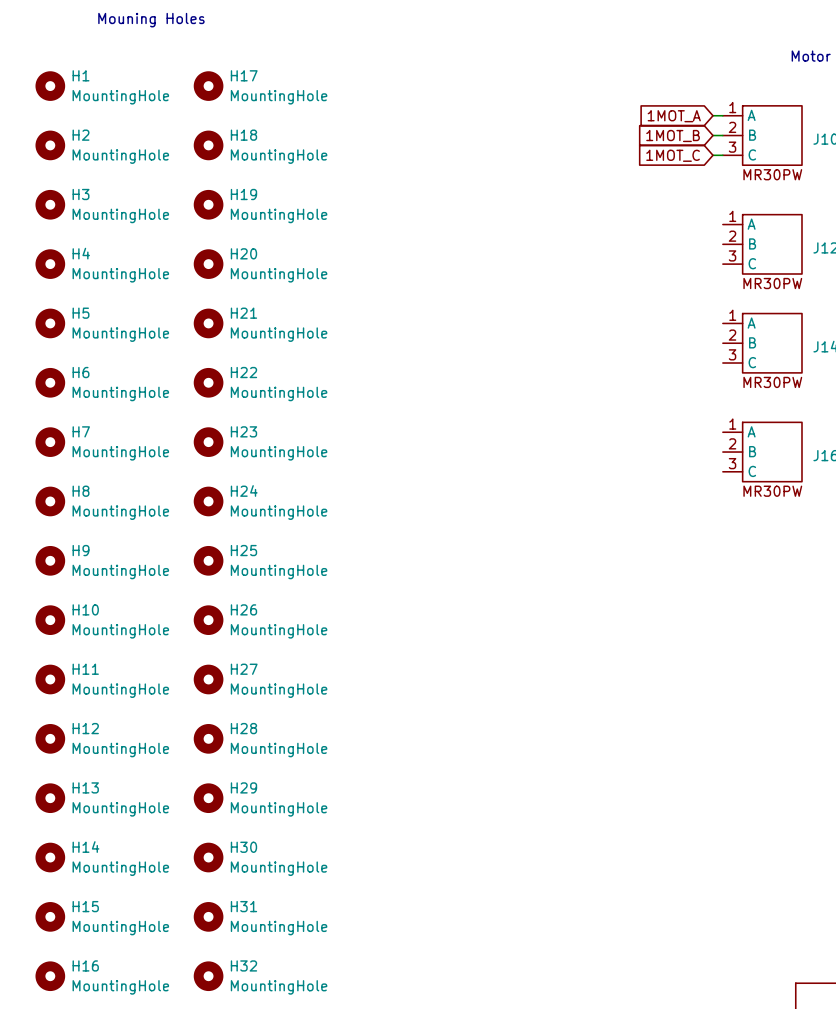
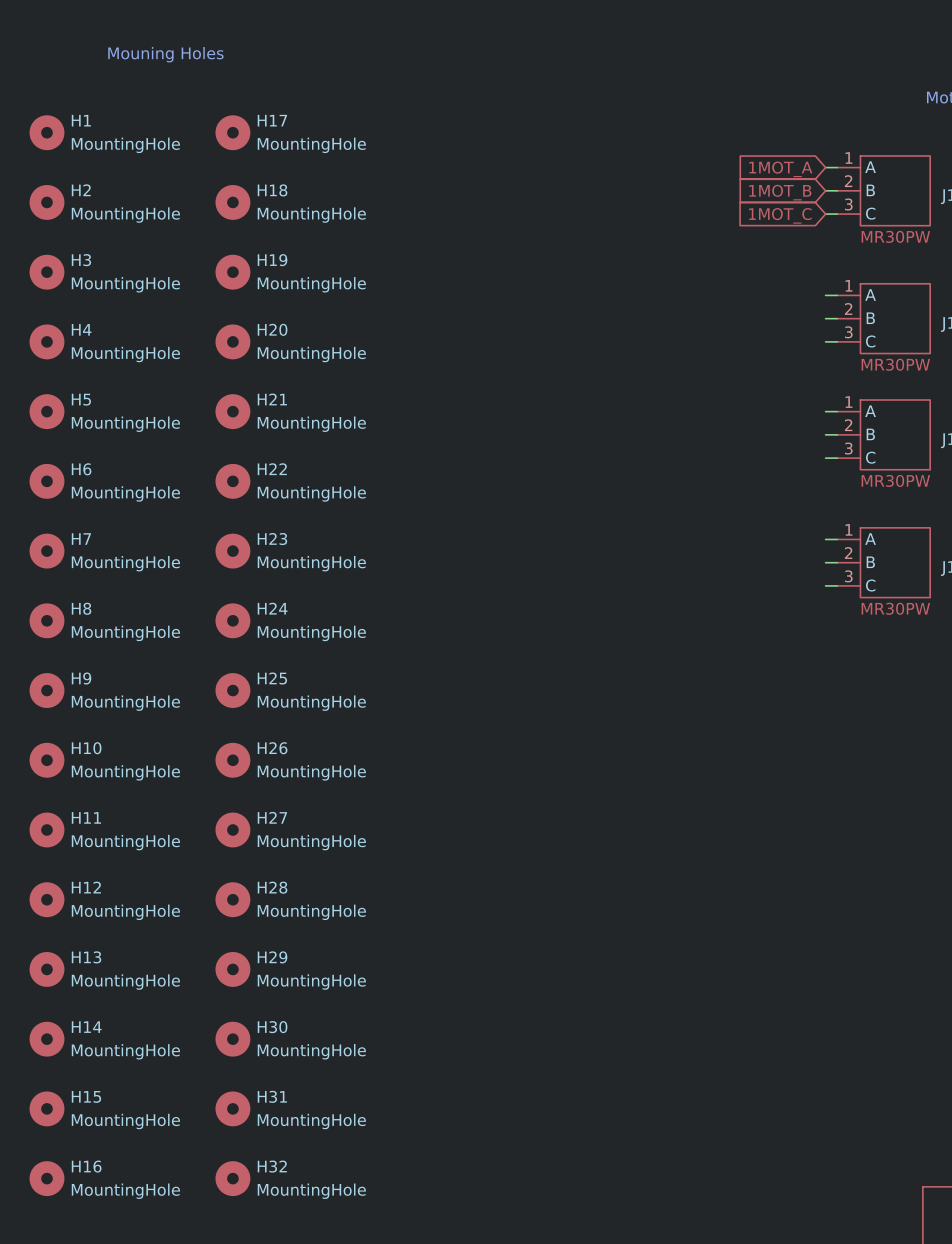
wire: none -> (825, 295) (837, 295)
wire: none -> (825, 318) (837, 318)
wire: none -> (825, 341) (837, 341)
wire: none -> (825, 411) (837, 411)
wire: none -> (825, 434) (837, 434)
wire: none -> (825, 458) (837, 458)
wire: none -> (825, 539) (837, 539)
wire: none -> (825, 562) (837, 562)
wire: none -> (825, 585) (837, 585)

